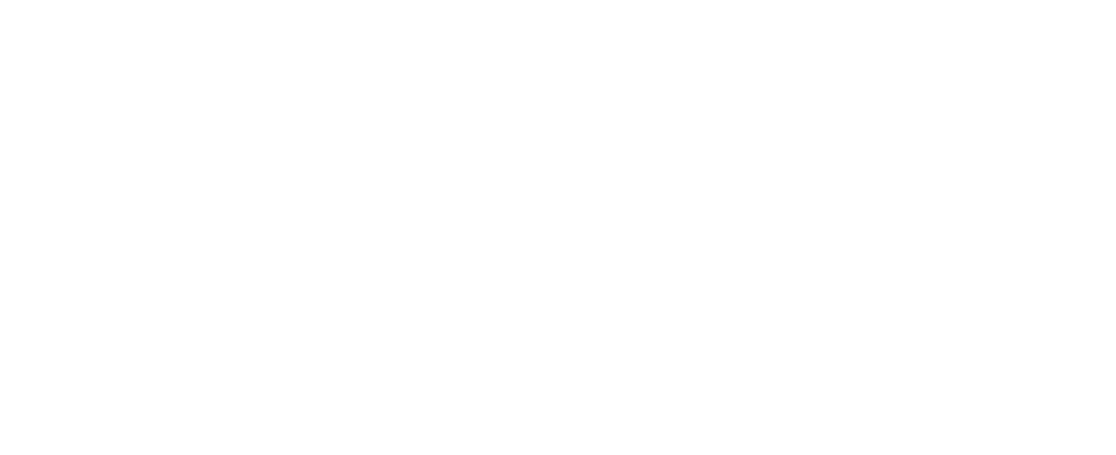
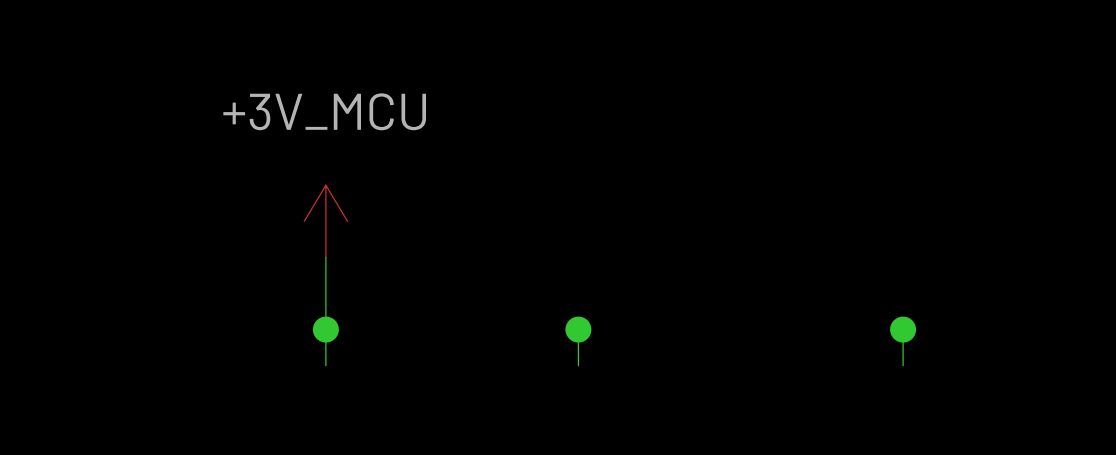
power symbol: none -> +3V_MCU (325, 221)
wire: none -> (325, 257) (325, 365)
junction: none -> (325, 329)
wire: none -> (578, 329) (578, 365)
junction: none -> (578, 329)
wire: none -> (903, 329) (903, 365)
junction: none -> (903, 329)

